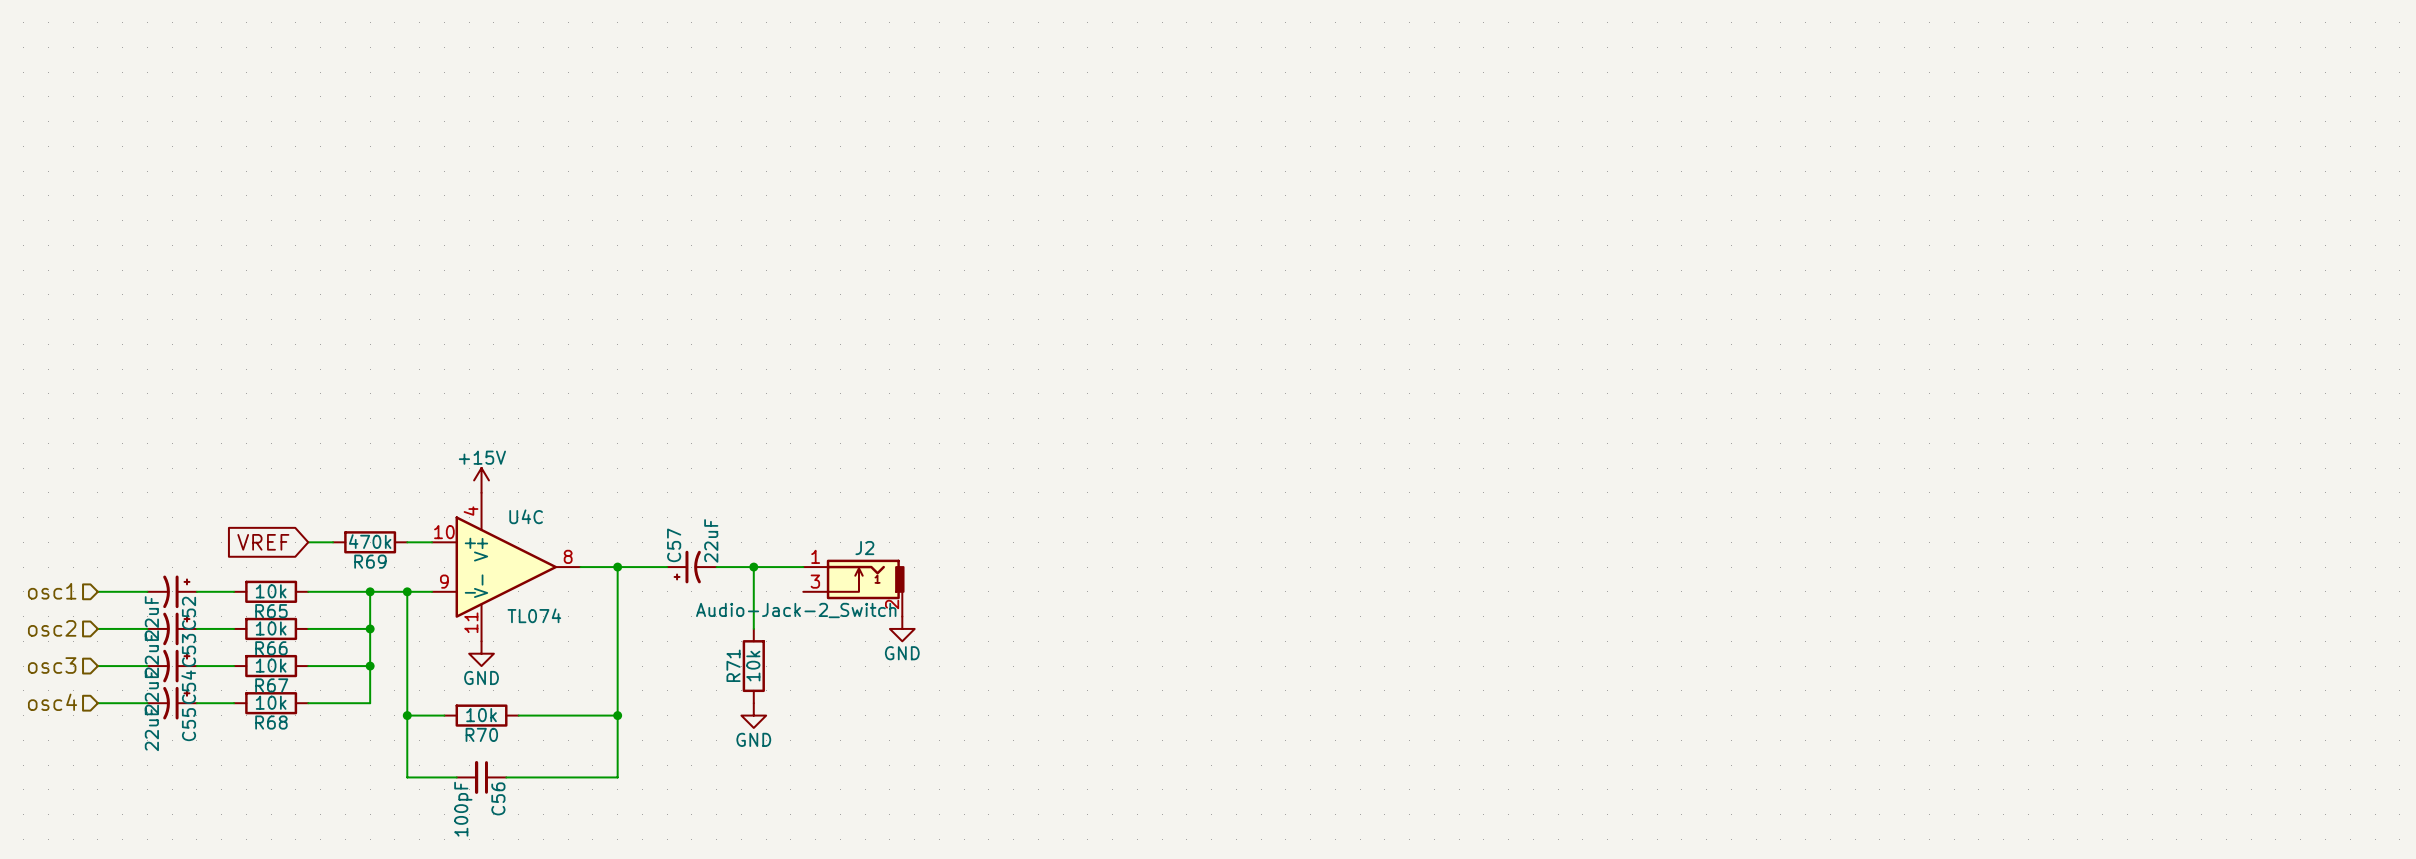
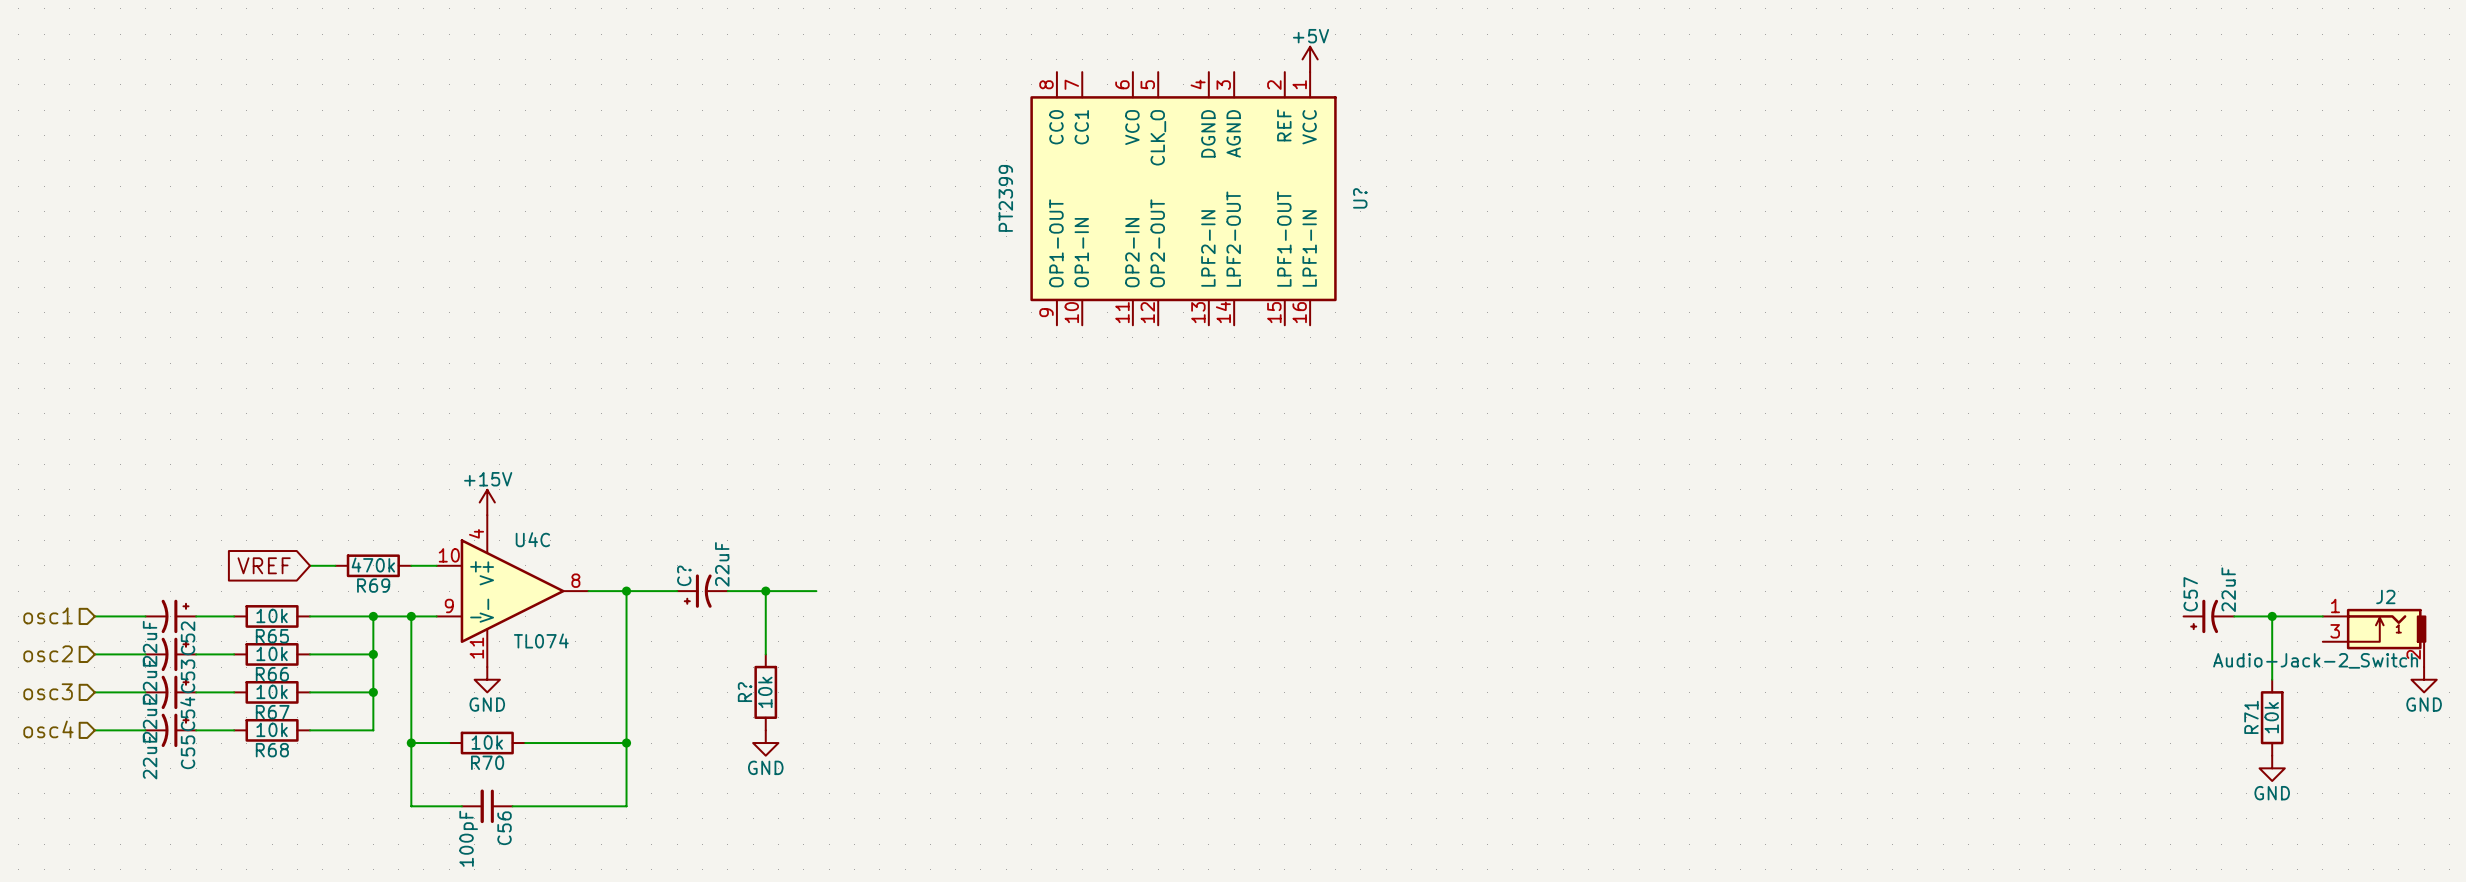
power symbol: none -> +5V (1310, 59)
U?: none -> PT2399 (1183, 198)
C57 name: C57 (674, 545) -> C? (684, 575)
J2 position: (853, 588) -> (2374, 637)
C57: none -> 22uF (2208, 616)
wire: none -> (2234, 616) (2322, 616)
wire: none -> (2272, 616) (2272, 679)
junction: none -> (2272, 616)
power symbol: GND (902, 628) -> none
power symbol: none -> GND (2424, 679)
R71 name: R71 (733, 665) -> R? (745, 692)
R71: none -> 10k (2272, 717)
power symbol: none -> GND (2272, 768)

